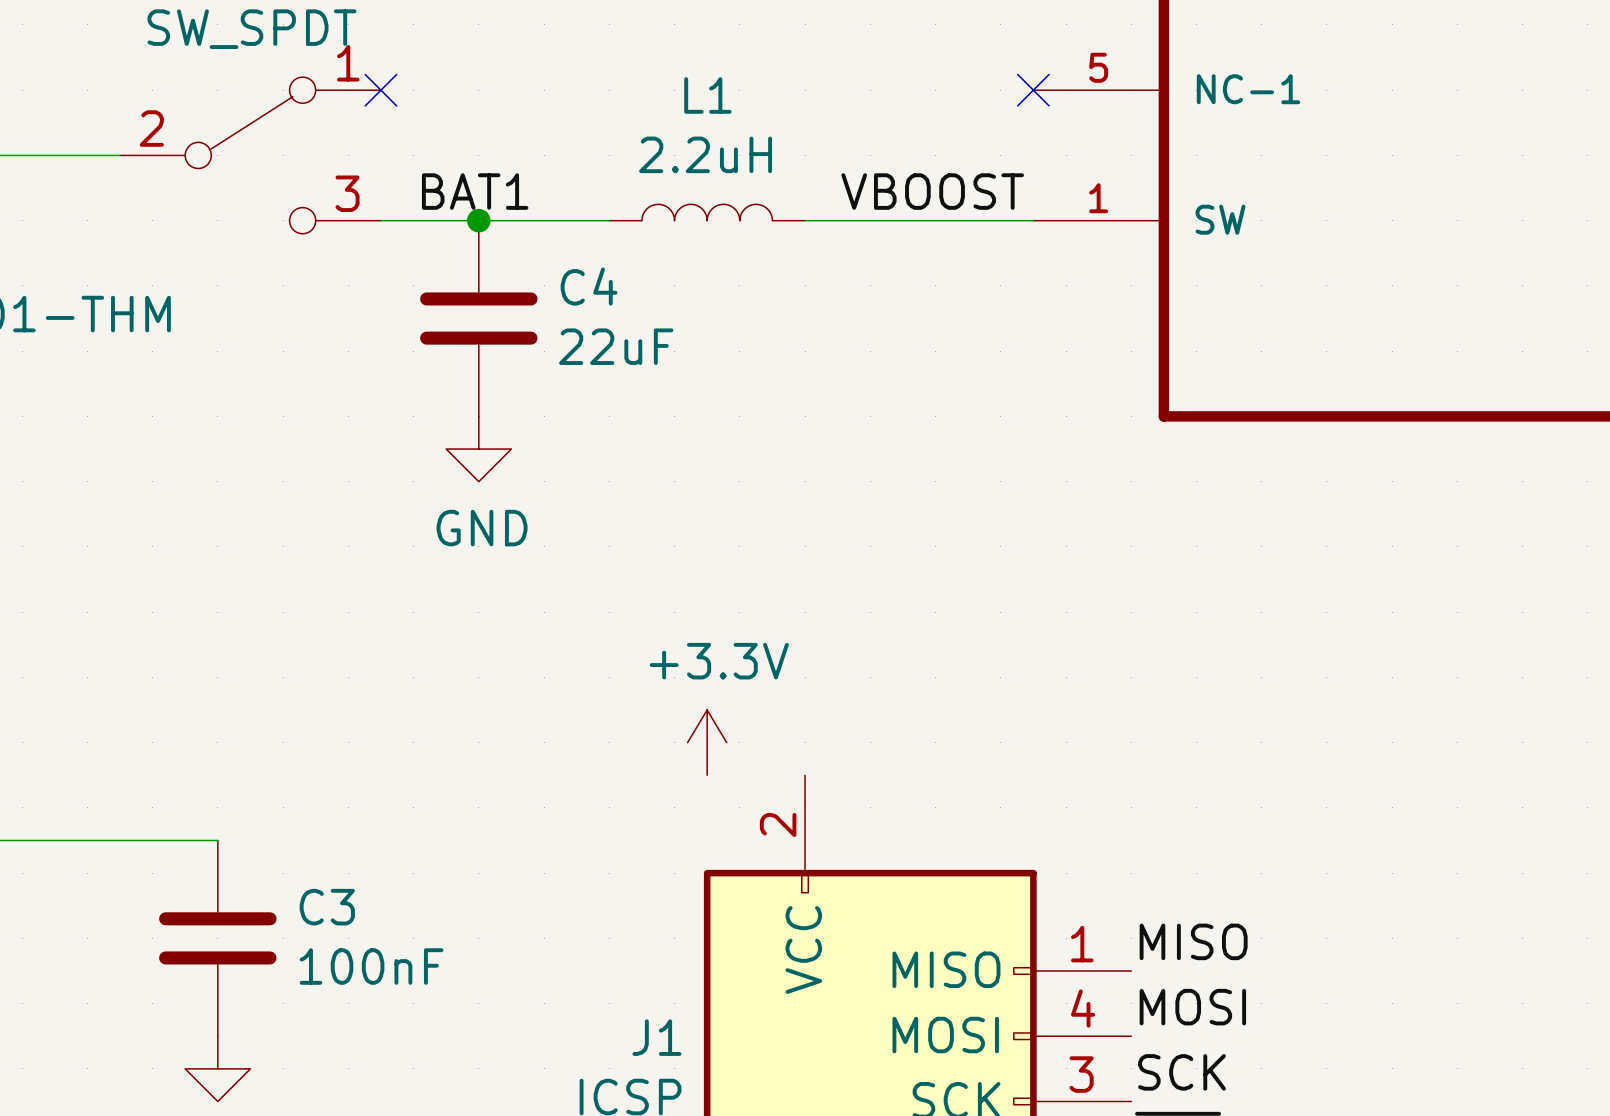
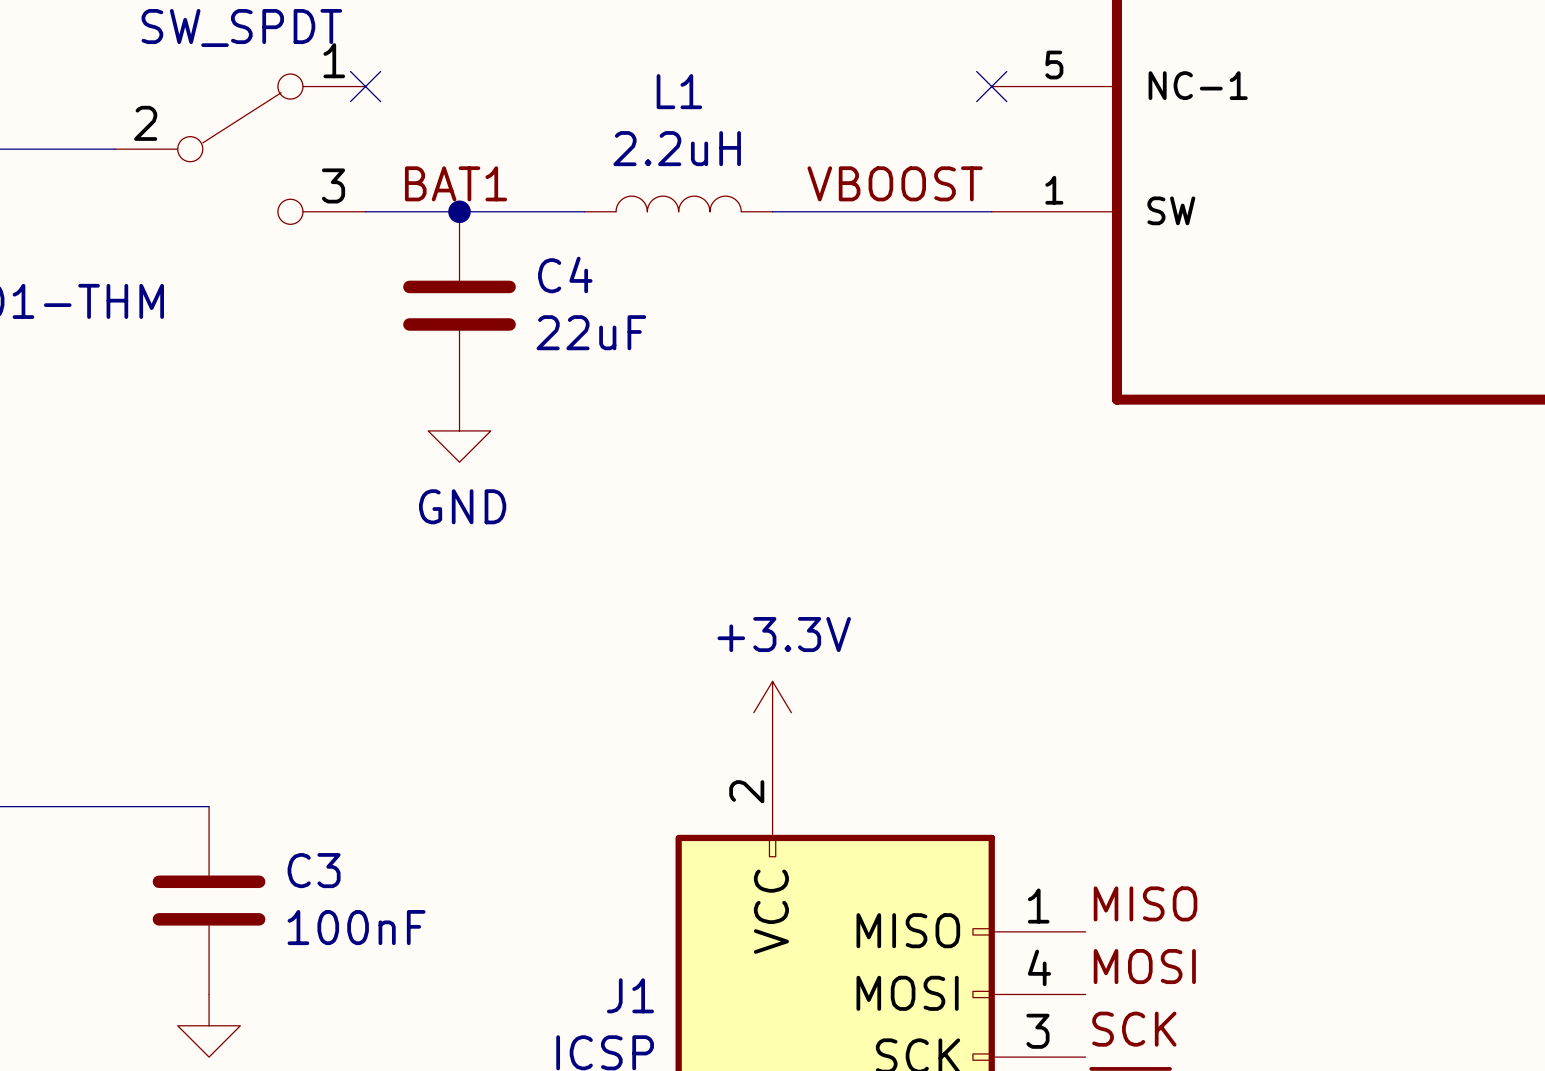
power symbol position: +3.3V (707, 742) -> +3.3V (772, 712)

